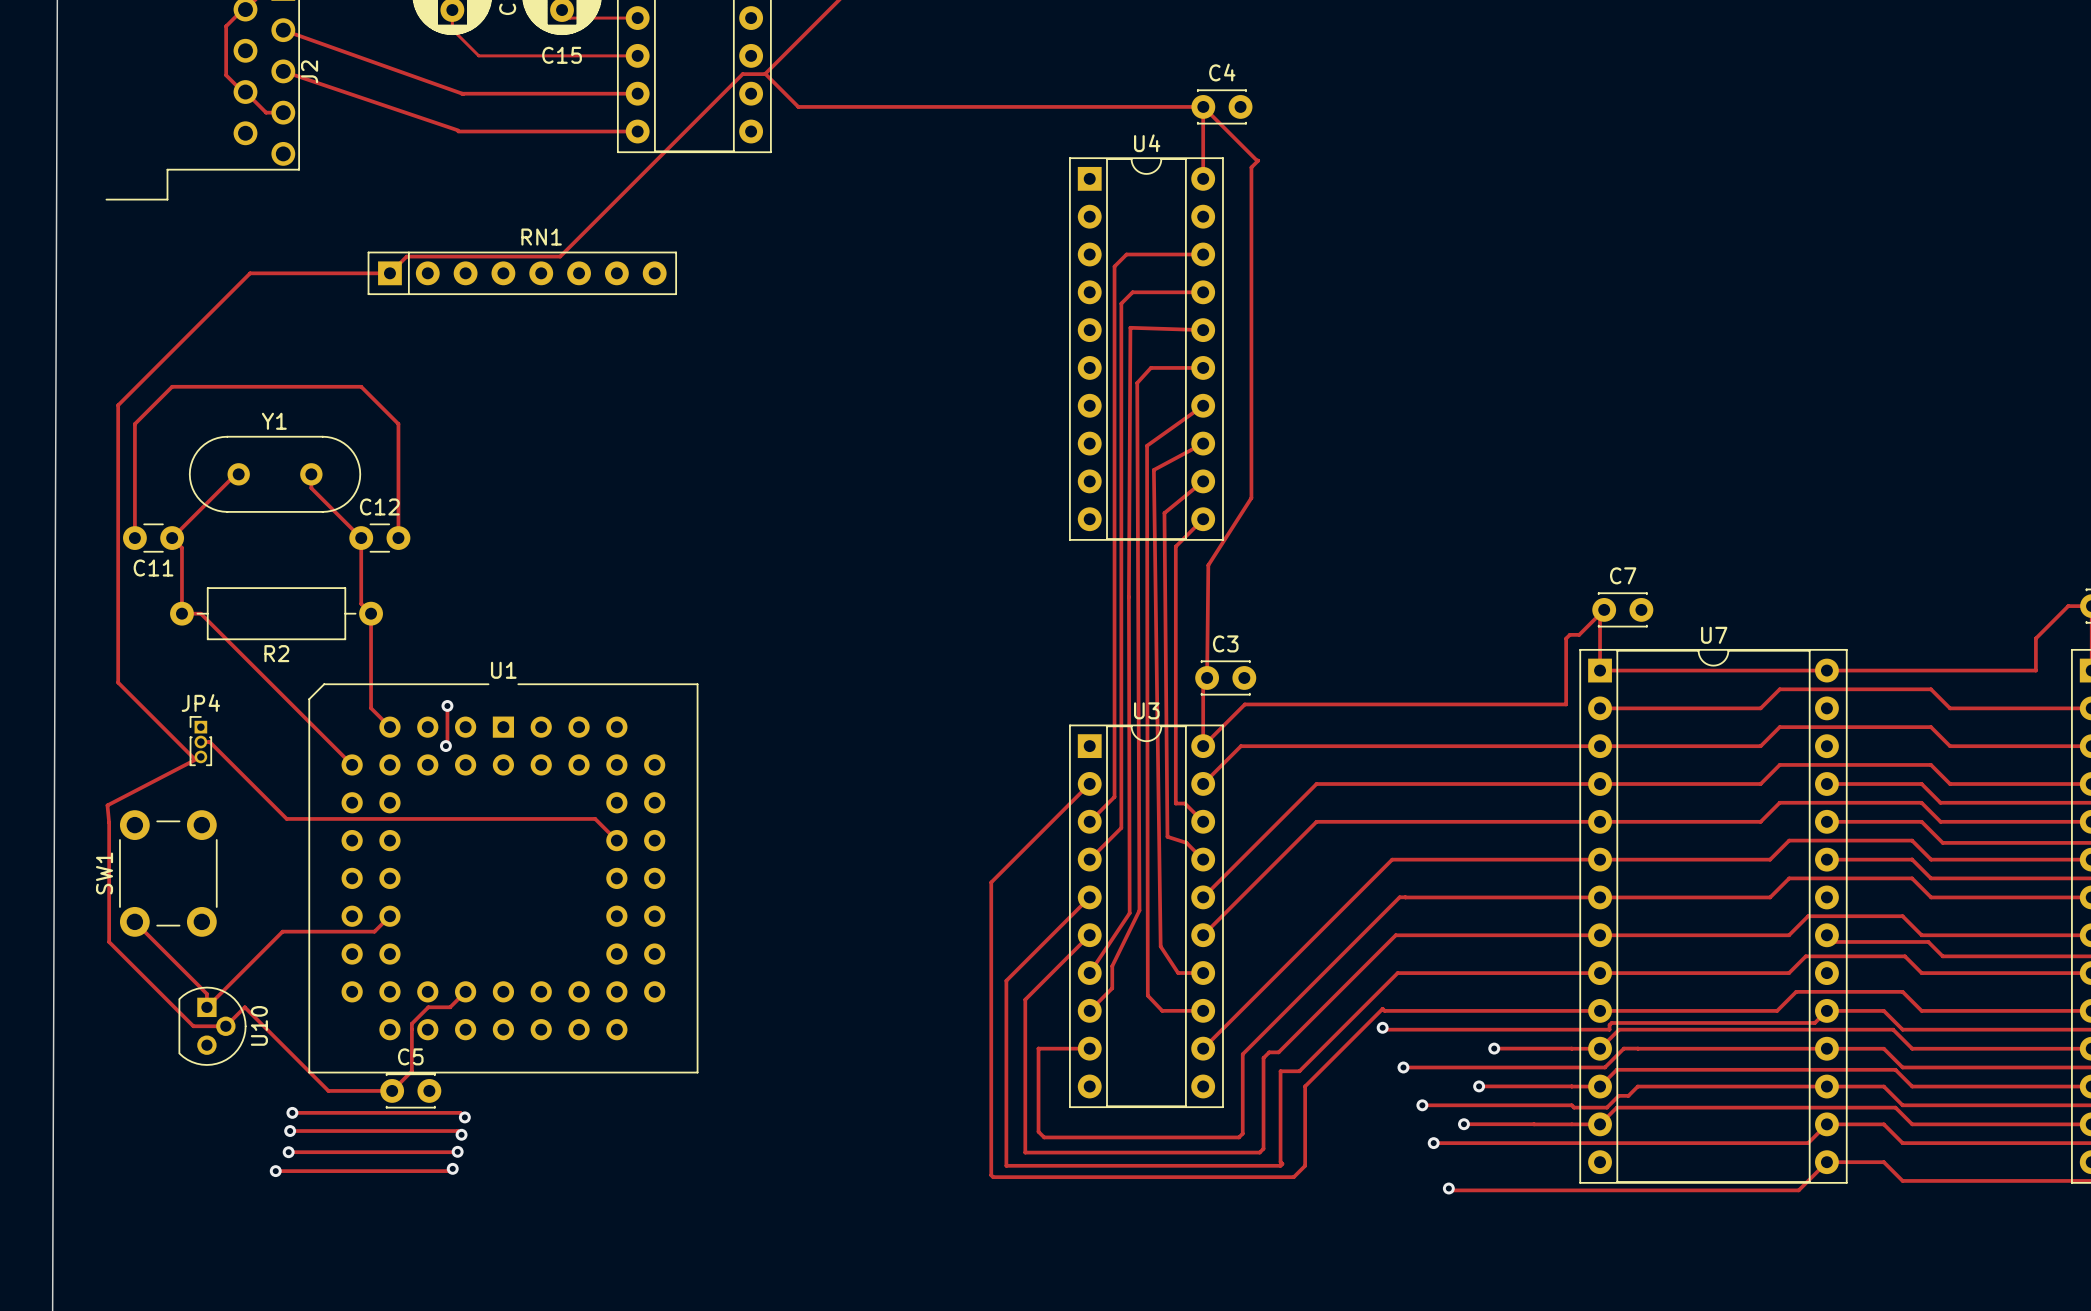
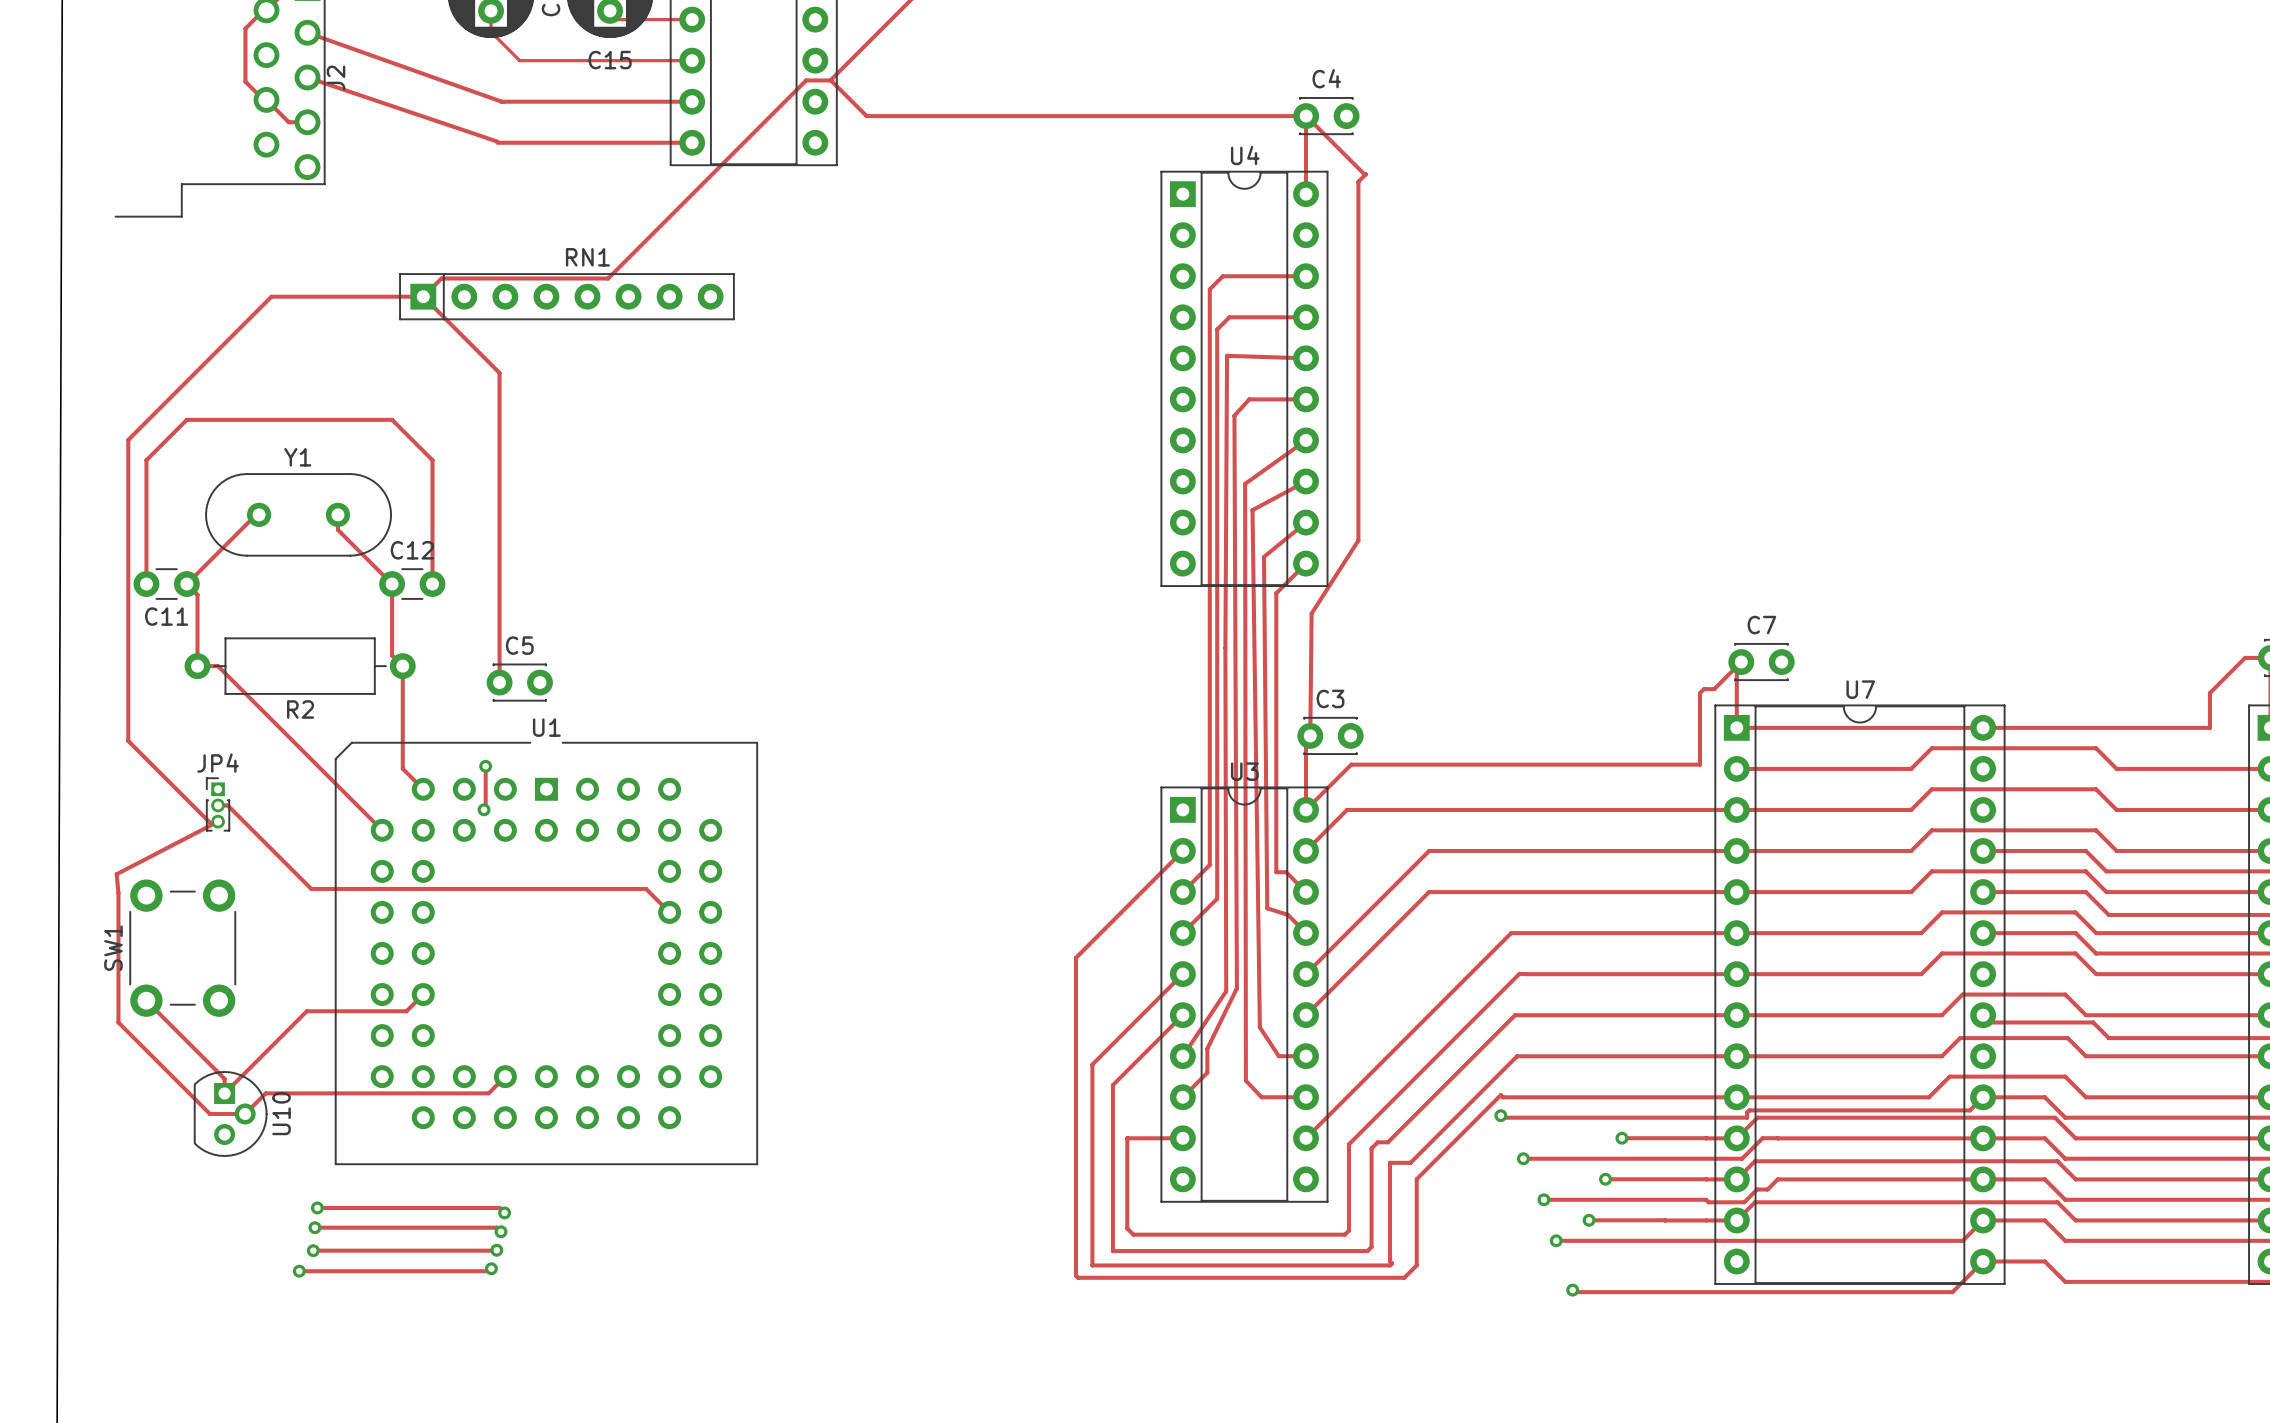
track: none -> (423, 296) (499, 372) (499, 682)
track: (244, 1007) (328, 1090) (392, 1090) (411, 1071) (411, 1023) (428, 1007) -> (265, 1093) (464, 1093)
C5 position: (410, 1090) -> (519, 682)

